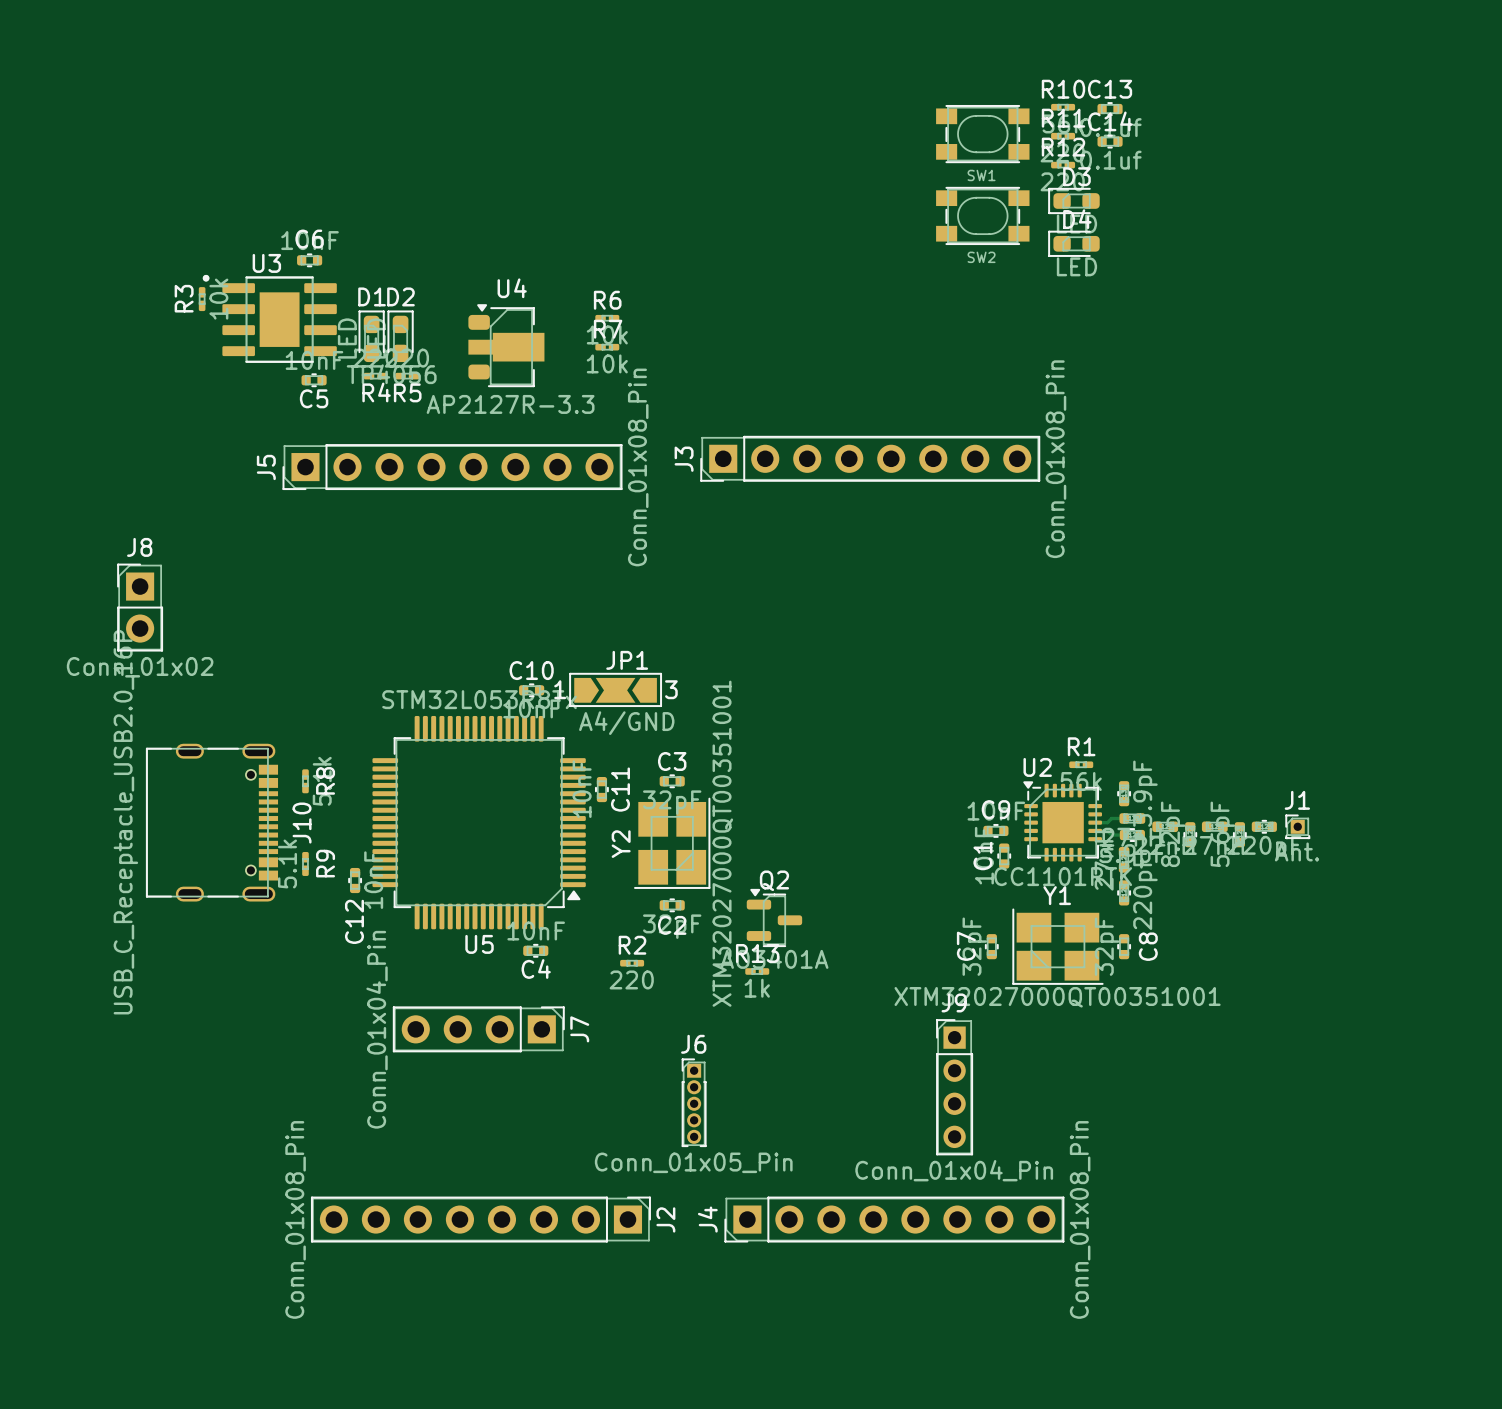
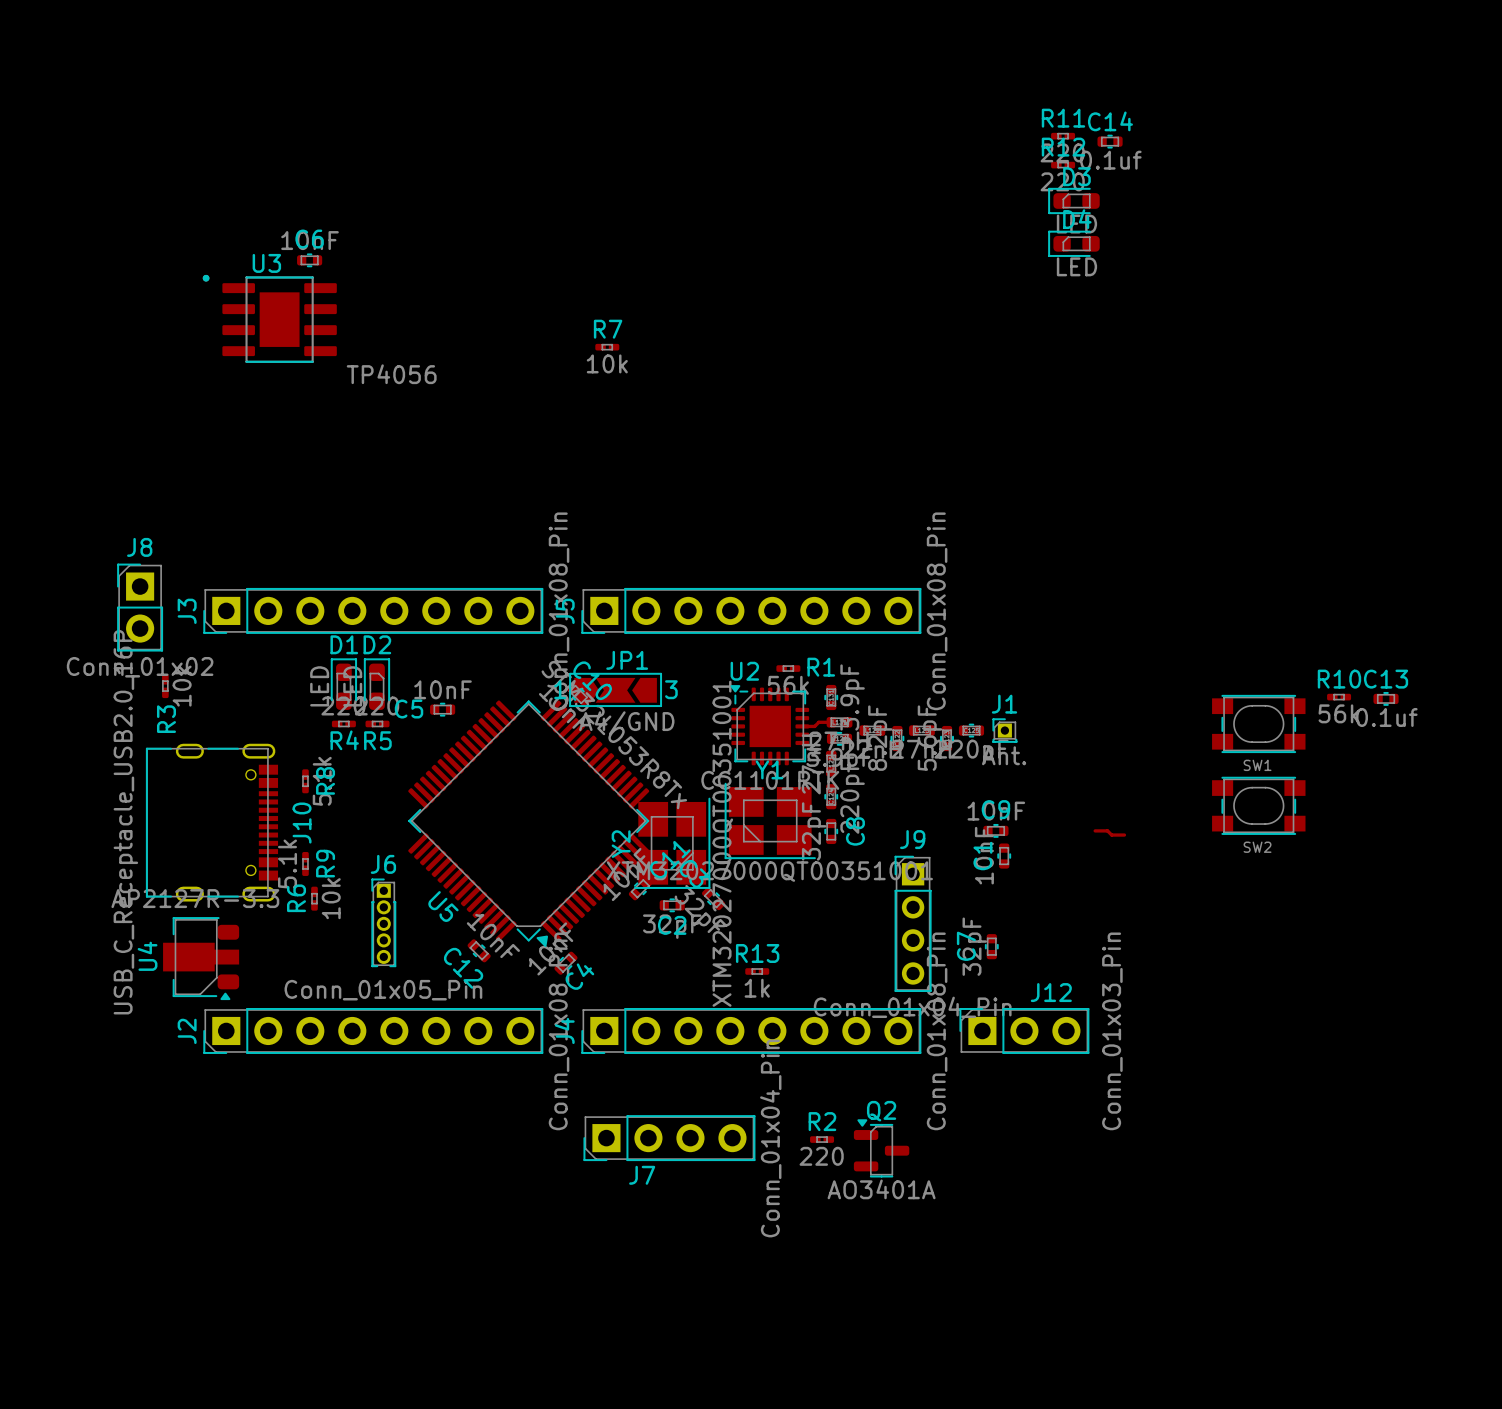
R10 position: (1063, 107) -> (1339, 697)
C13 position: (1110, 109) -> (1386, 698)
SW1 position: (982, 134) -> (1258, 723)
SW2 position: (982, 215) -> (1258, 805)
U4 name position: U4 (512, 288) -> U4 (147, 956)
R3 name position: R3 (184, 298) -> R3 (166, 719)
R3 position: (202, 299) -> (165, 686)
R6 rotation: 0° (607, 318) -> 90° clockwise (314, 898)
R6 position: (607, 318) -> (314, 898)
D1 position: (371, 336) -> (343, 684)
D2 position: (400, 336) -> (376, 684)
U4 rotation: 0° (506, 345) -> 180° (201, 958)
U4 position: (506, 345) -> (201, 958)
R4 position: (375, 376) -> (343, 723)
R5 position: (407, 376) -> (377, 723)
C5 position: (314, 380) -> (442, 709)
C5 name position: C5 (314, 398) -> C5 (409, 709)
J3 position: (870, 458) -> (373, 610)
J5 position: (452, 467) -> (751, 610)
C10 rotation: 0° (531, 690) -> 45° clockwise (578, 694)
C10 position: (531, 690) -> (578, 694)
R1 name position: R1 (1081, 746) -> R1 (821, 667)
R1 position: (1081, 764) -> (788, 668)
C3 rotation: 0° (672, 781) -> 45° clockwise (713, 898)
C3 position: (672, 781) -> (713, 898)
C11 rotation: 0° (601, 789) -> 45° clockwise (640, 888)
C11 position: (601, 789) -> (640, 888)
part position: (1124, 793) -> (831, 697)
track: (1124, 818) (1111, 818) (1107, 822) (1095, 822) -> (831, 722) (818, 722) (814, 726) (802, 726)
part position: (1132, 818) -> (839, 722)
U2 position: (1062, 821) -> (769, 725)
U5 rotation: 0° (479, 822) -> 45° clockwise (528, 823)
part position: (1165, 826) -> (872, 730)
part position: (1214, 826) -> (921, 730)
part position: (1264, 826) -> (971, 730)
J1 position: (1297, 826) -> (1004, 730)
part position: (1190, 834) -> (897, 738)
part position: (1239, 834) -> (947, 738)
part position: (1132, 835) -> (839, 738)
part position: (1124, 859) -> (831, 763)
C12 rotation: 0° (355, 880) -> 45° counterclockwise (479, 950)
C12 position: (355, 880) -> (479, 950)
part position: (1124, 892) -> (831, 796)
Q2 position: (774, 917) -> (881, 1148)
Y1 position: (1057, 946) -> (770, 820)
C8 position: (1124, 946) -> (831, 831)
C4 rotation: 0° (535, 950) -> 45° counterclockwise (565, 963)
C4 position: (535, 950) -> (565, 963)
R2 position: (632, 963) -> (822, 1139)
J7 rotation: 0° (478, 1029) -> 180° (669, 1138)
J7 position: (478, 1029) -> (669, 1138)
J7 name position: J7 (579, 1029) -> J7 (642, 1175)
J12: none -> Conn_01x03_Pin (1024, 1030)
J9 position: (954, 1087) -> (913, 923)
J6 position: (694, 1102) -> (383, 922)
J6 value position: Conn_01x05_Pin (693, 1162) -> Conn_01x05_Pin (383, 990)
J2 rotation: 0° (480, 1219) -> 180° (373, 1030)
J2 position: (480, 1219) -> (373, 1030)
J4 position: (894, 1219) -> (751, 1030)

